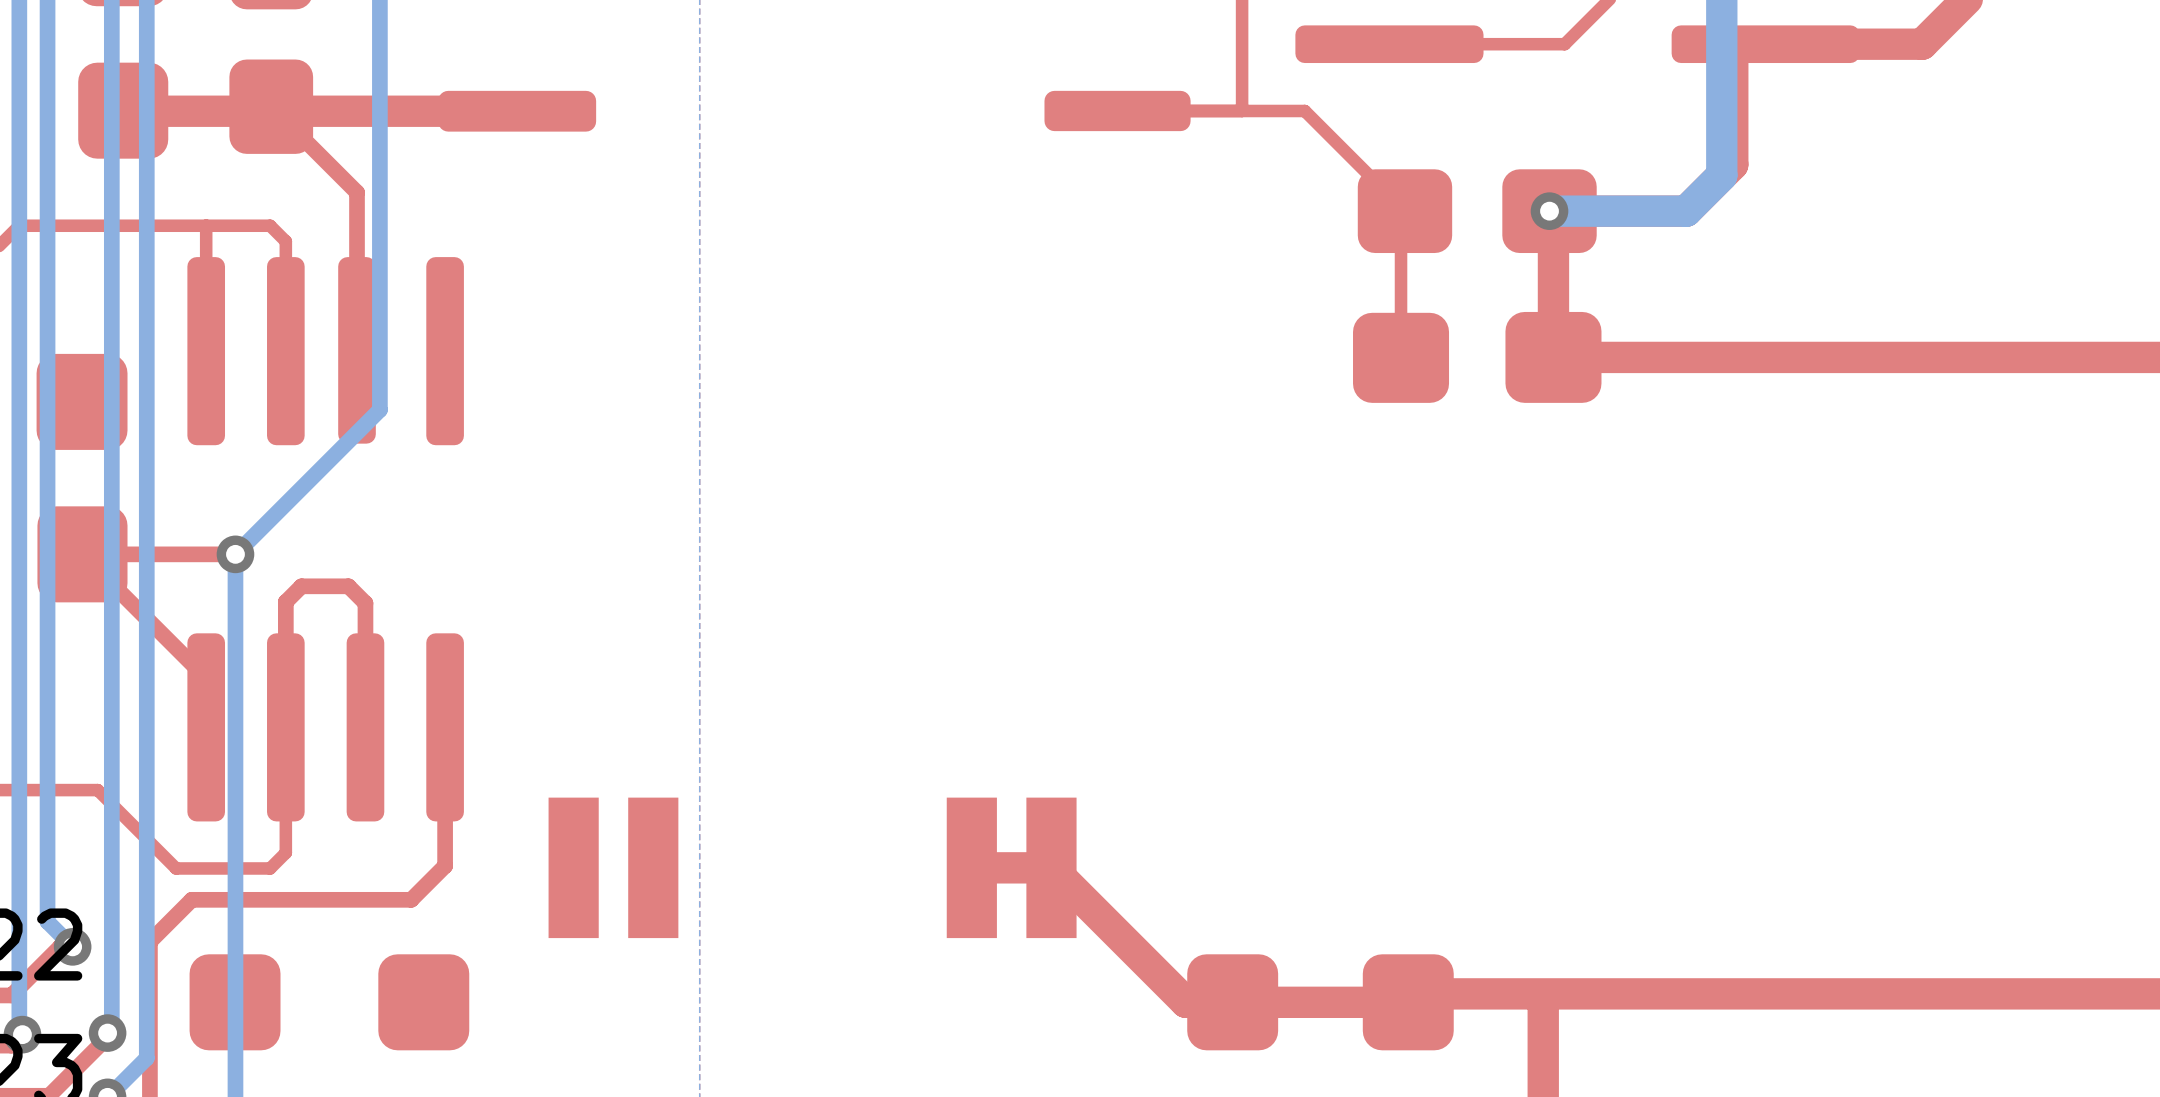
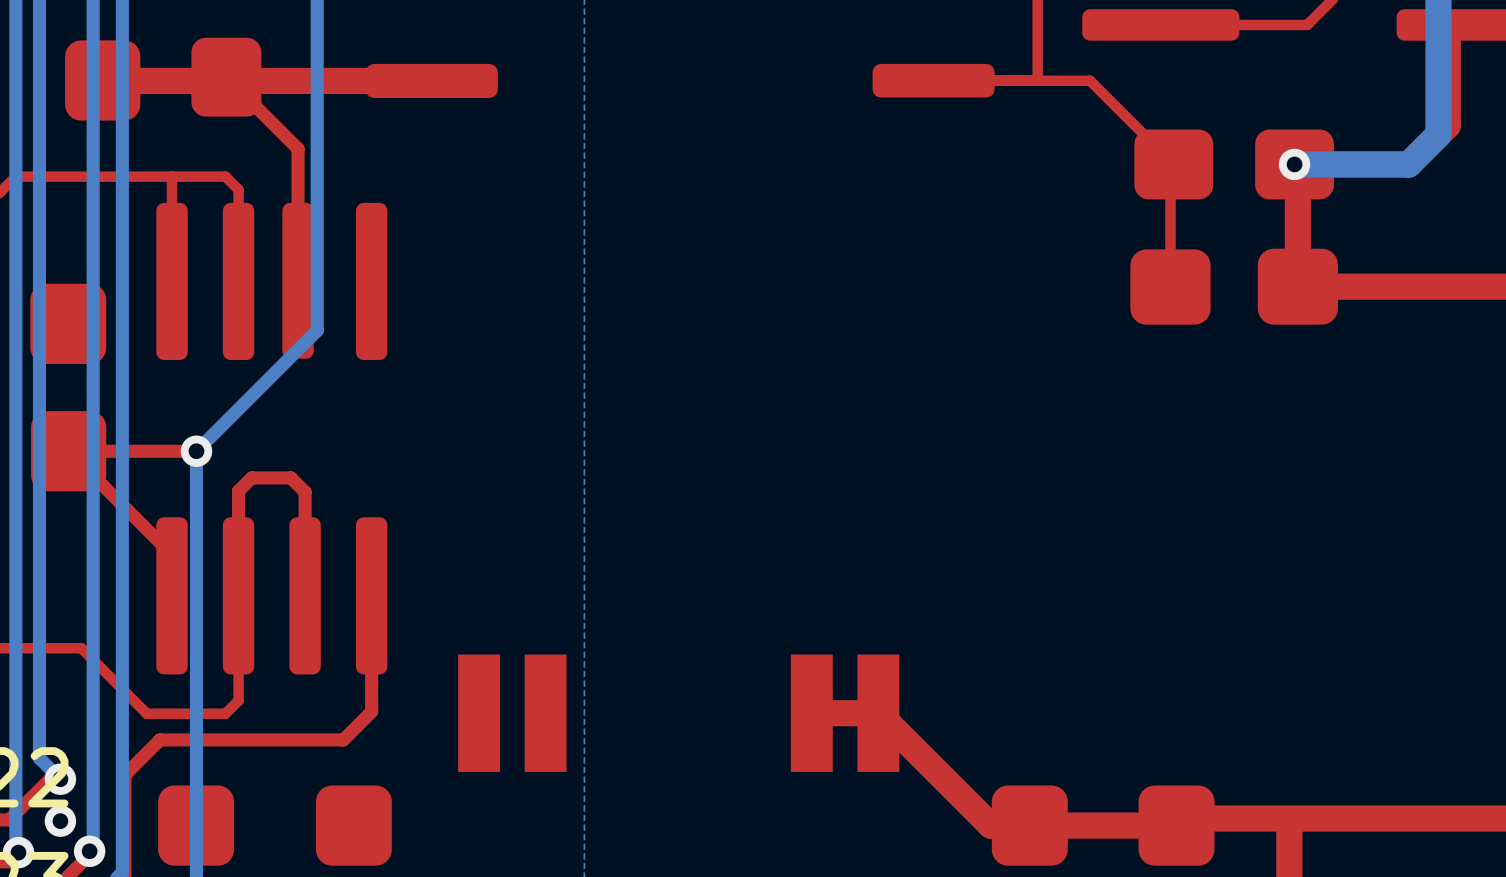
via: none -> (60, 821)

